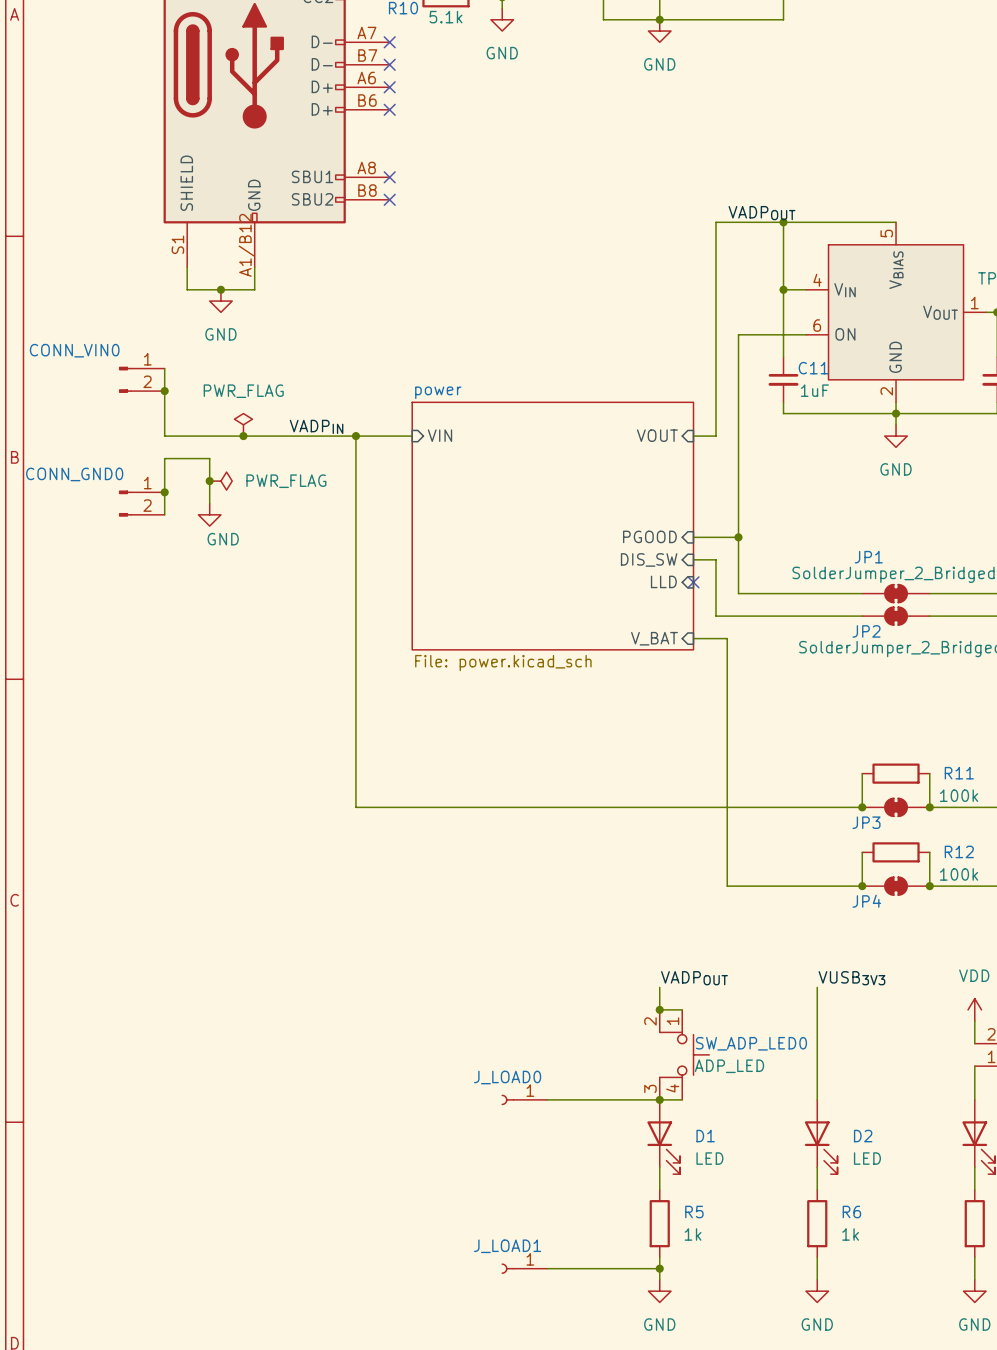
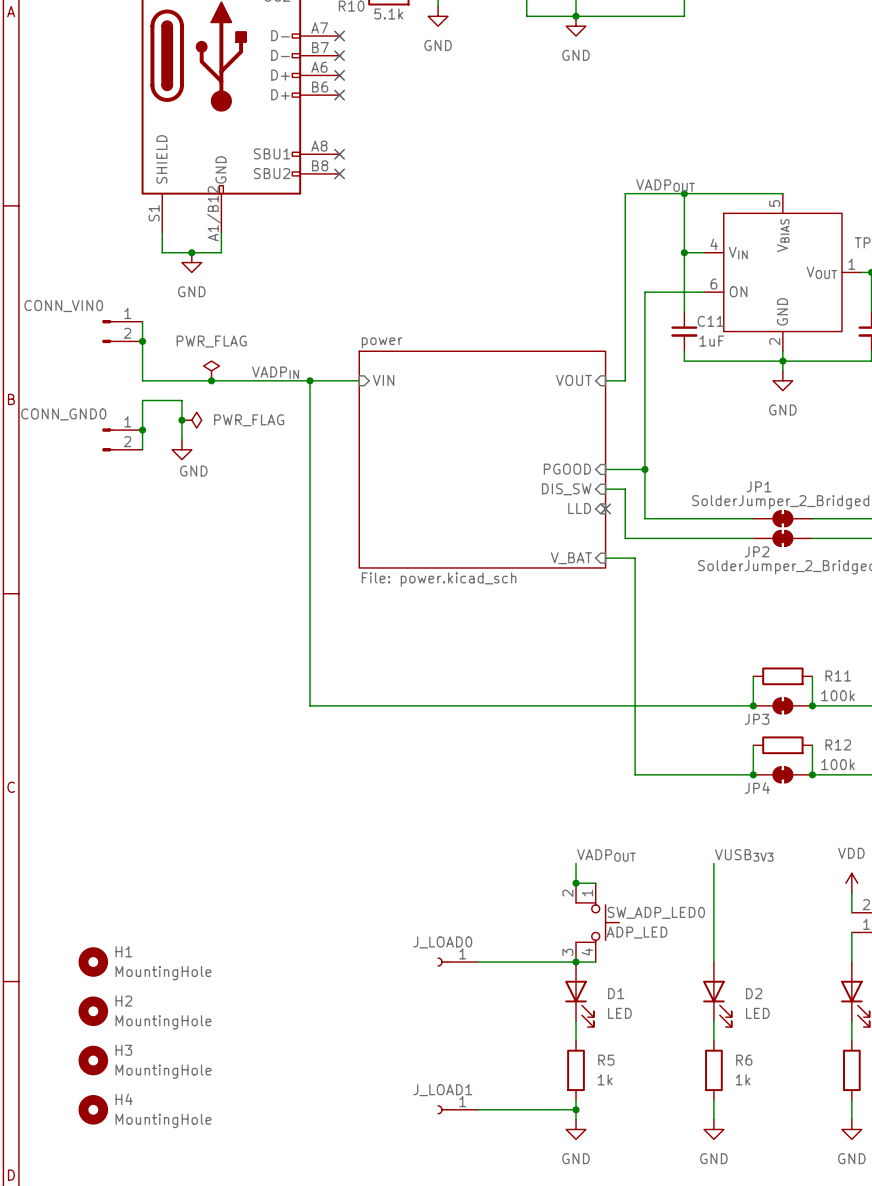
H1: none -> MountingHole (93, 962)
H2: none -> MountingHole (93, 1011)
H3: none -> MountingHole (93, 1060)
H4: none -> MountingHole (93, 1109)

